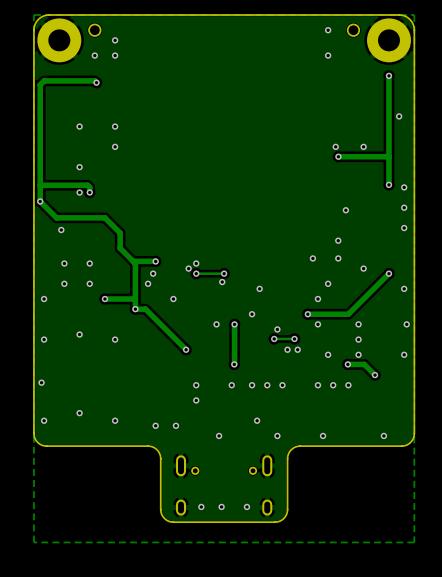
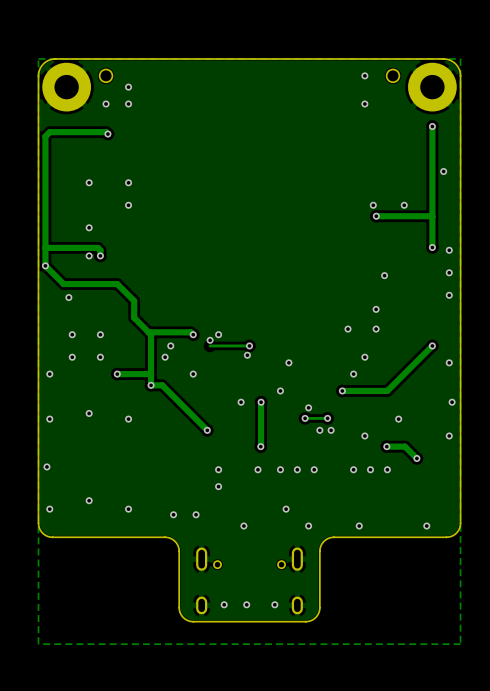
track: none -> (173, 332) (190, 332) (193, 334)
via: (155, 261) -> none
via: none -> (193, 334)
via: (363, 268) -> none
track: none -> (218, 345) (210, 345)
via: (196, 273) -> none
via: (317, 324) -> none
via: (358, 324) -> none
via: (358, 354) -> none

